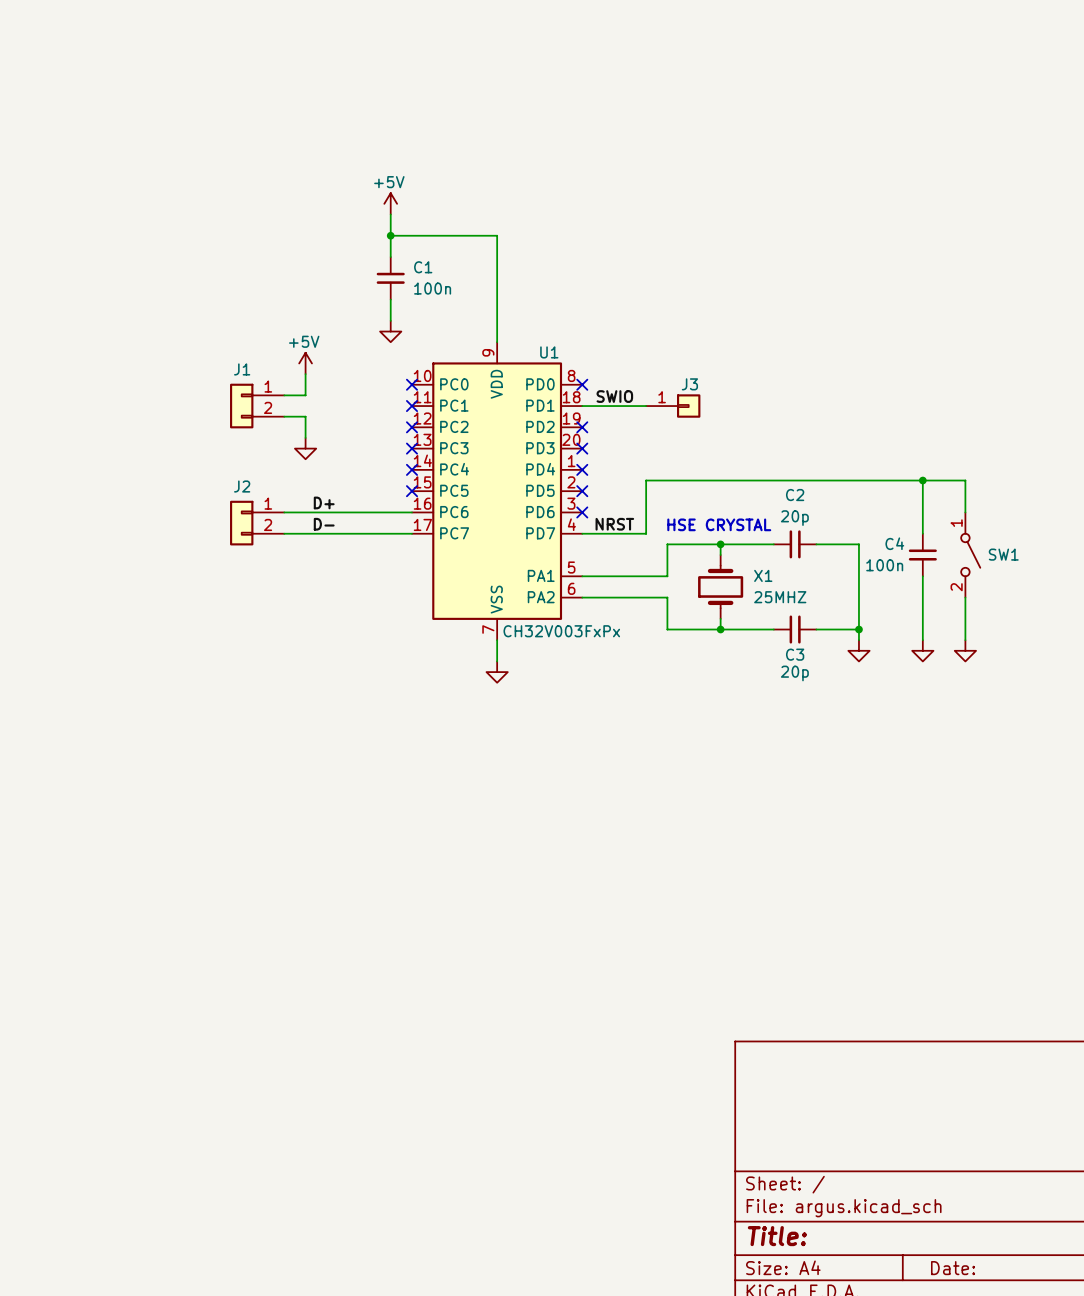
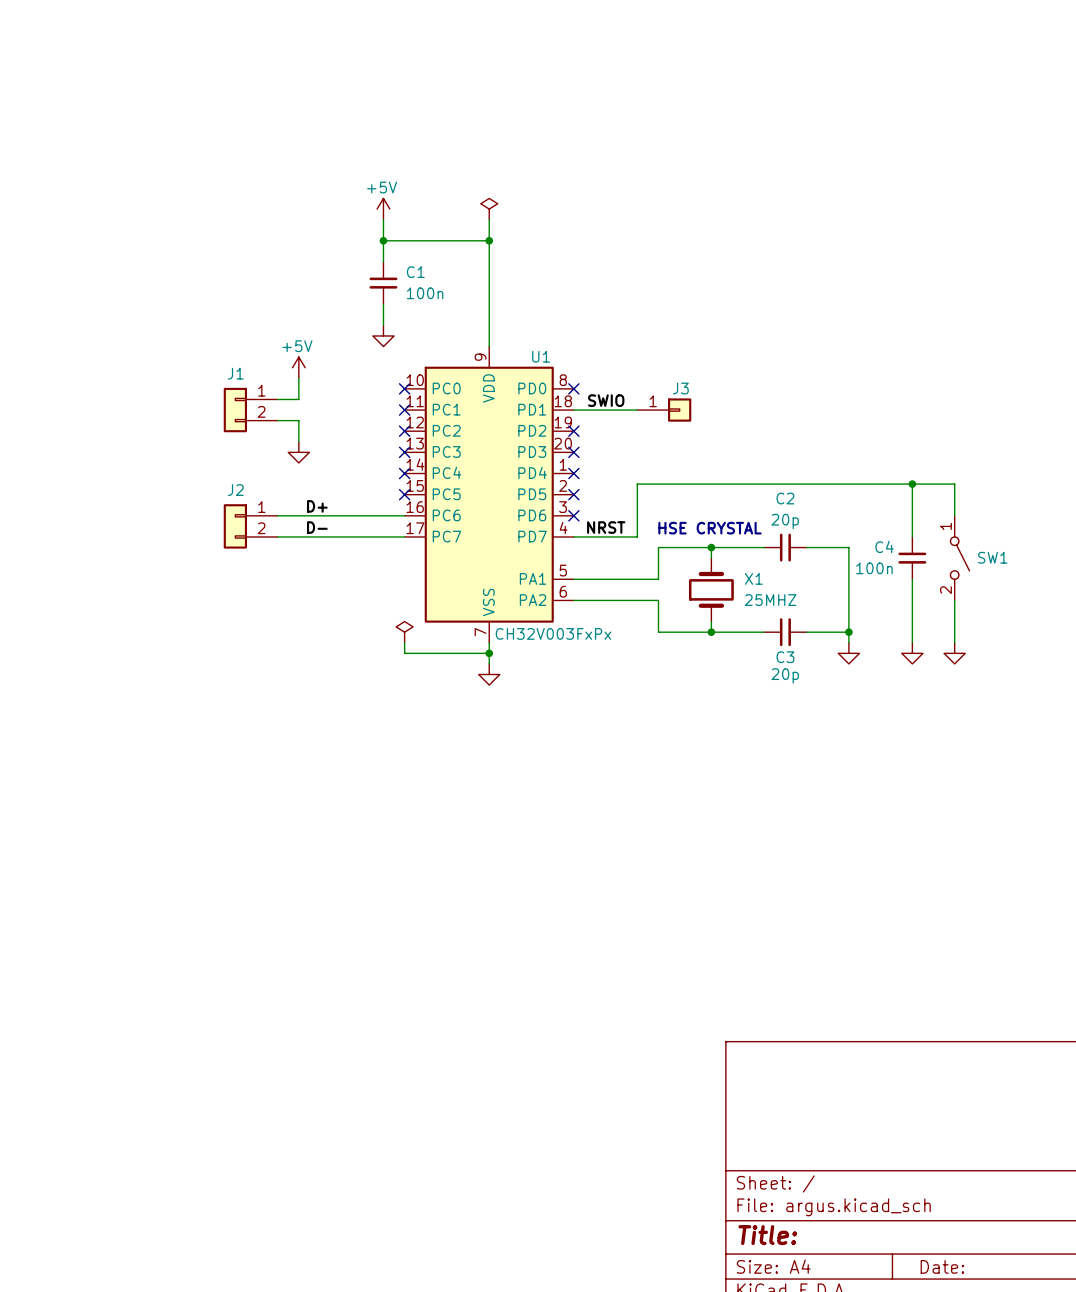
power symbol: none -> (489, 209)
wire: none -> (489, 219) (489, 240)
junction: none -> (489, 240)
power symbol: none -> (404, 632)
wire: none -> (404, 642) (404, 653) (489, 653)
junction: none -> (489, 653)

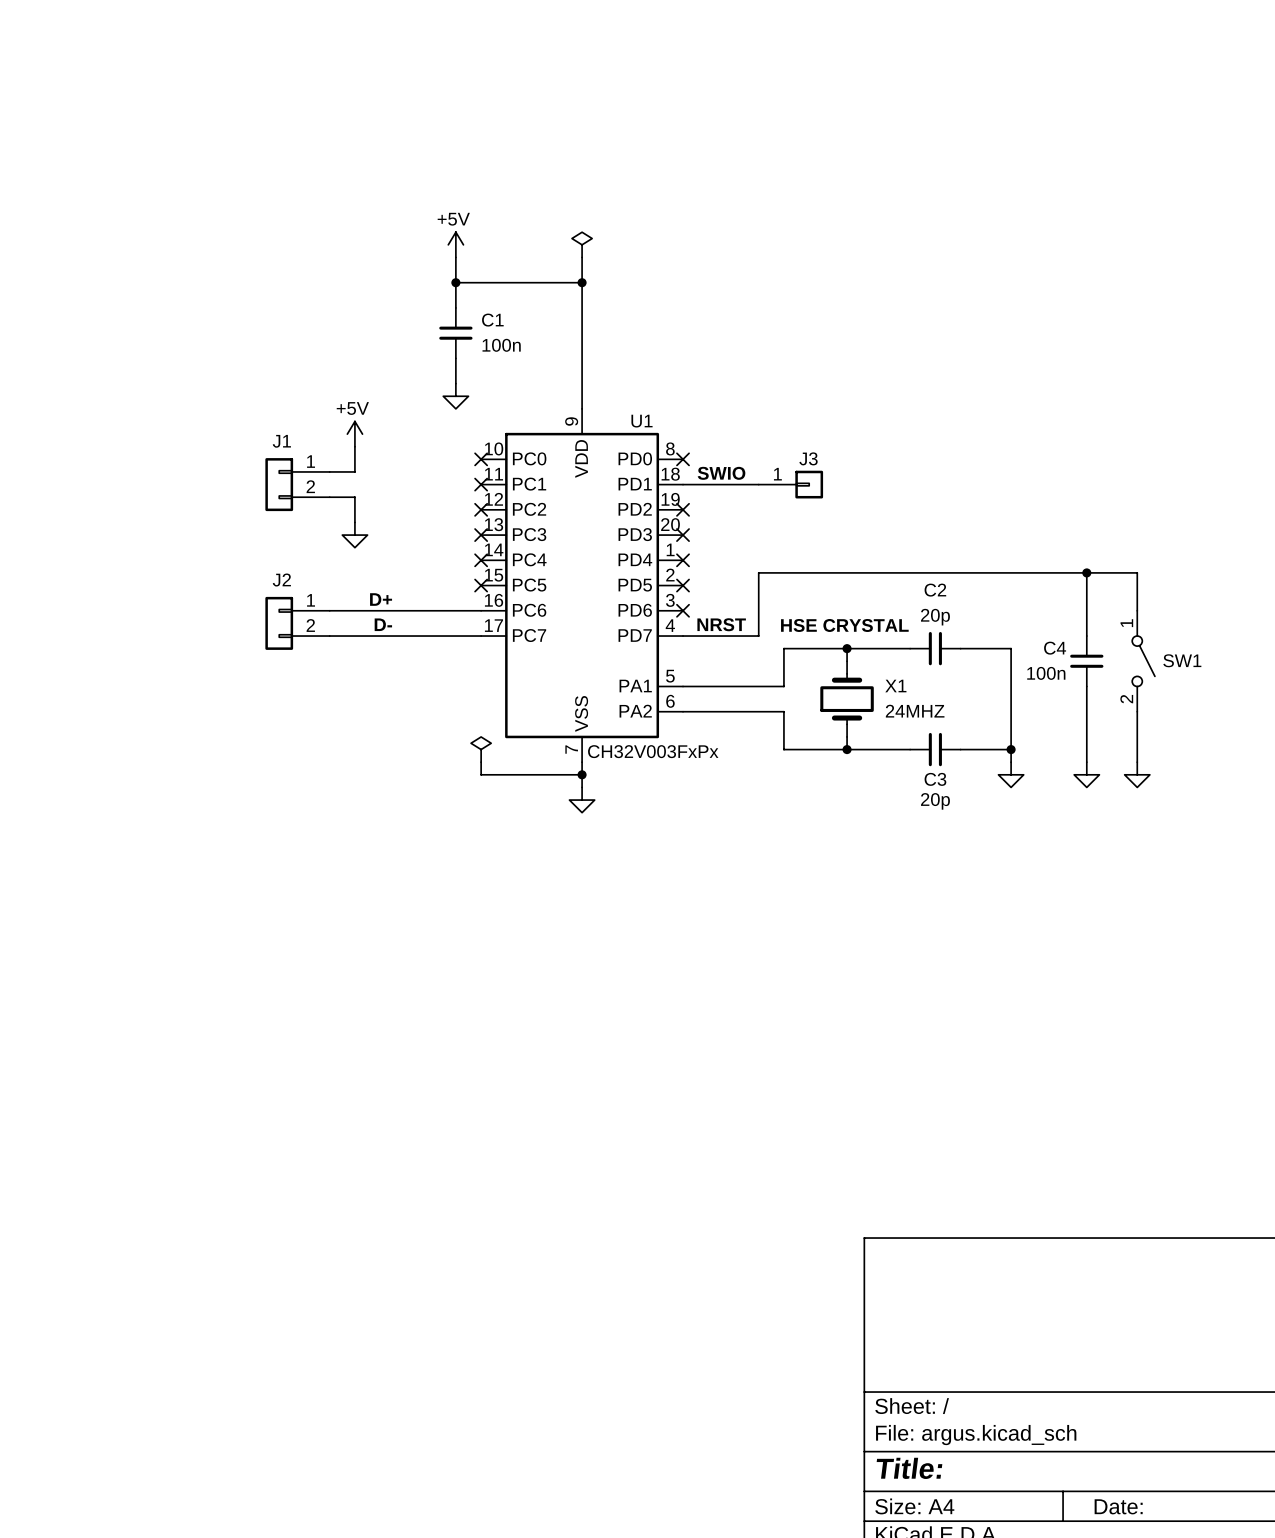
X1 value: 25MHZ (770, 600) -> 24MHZ (915, 711)

